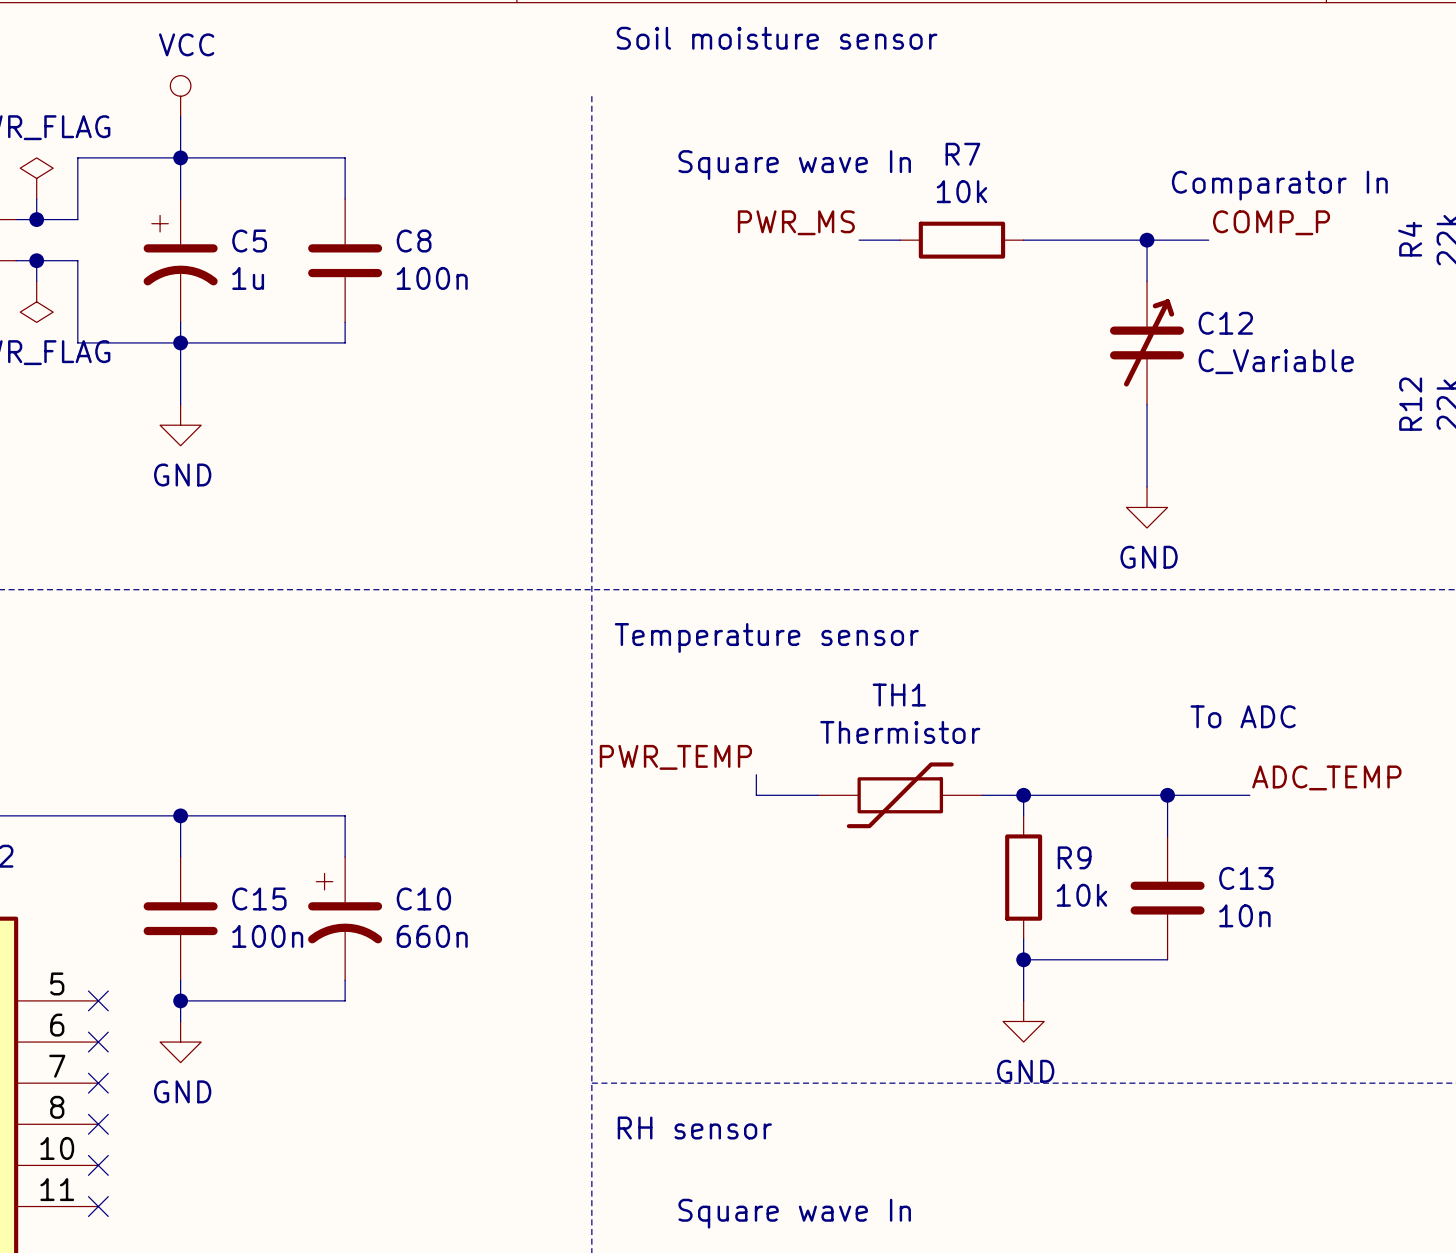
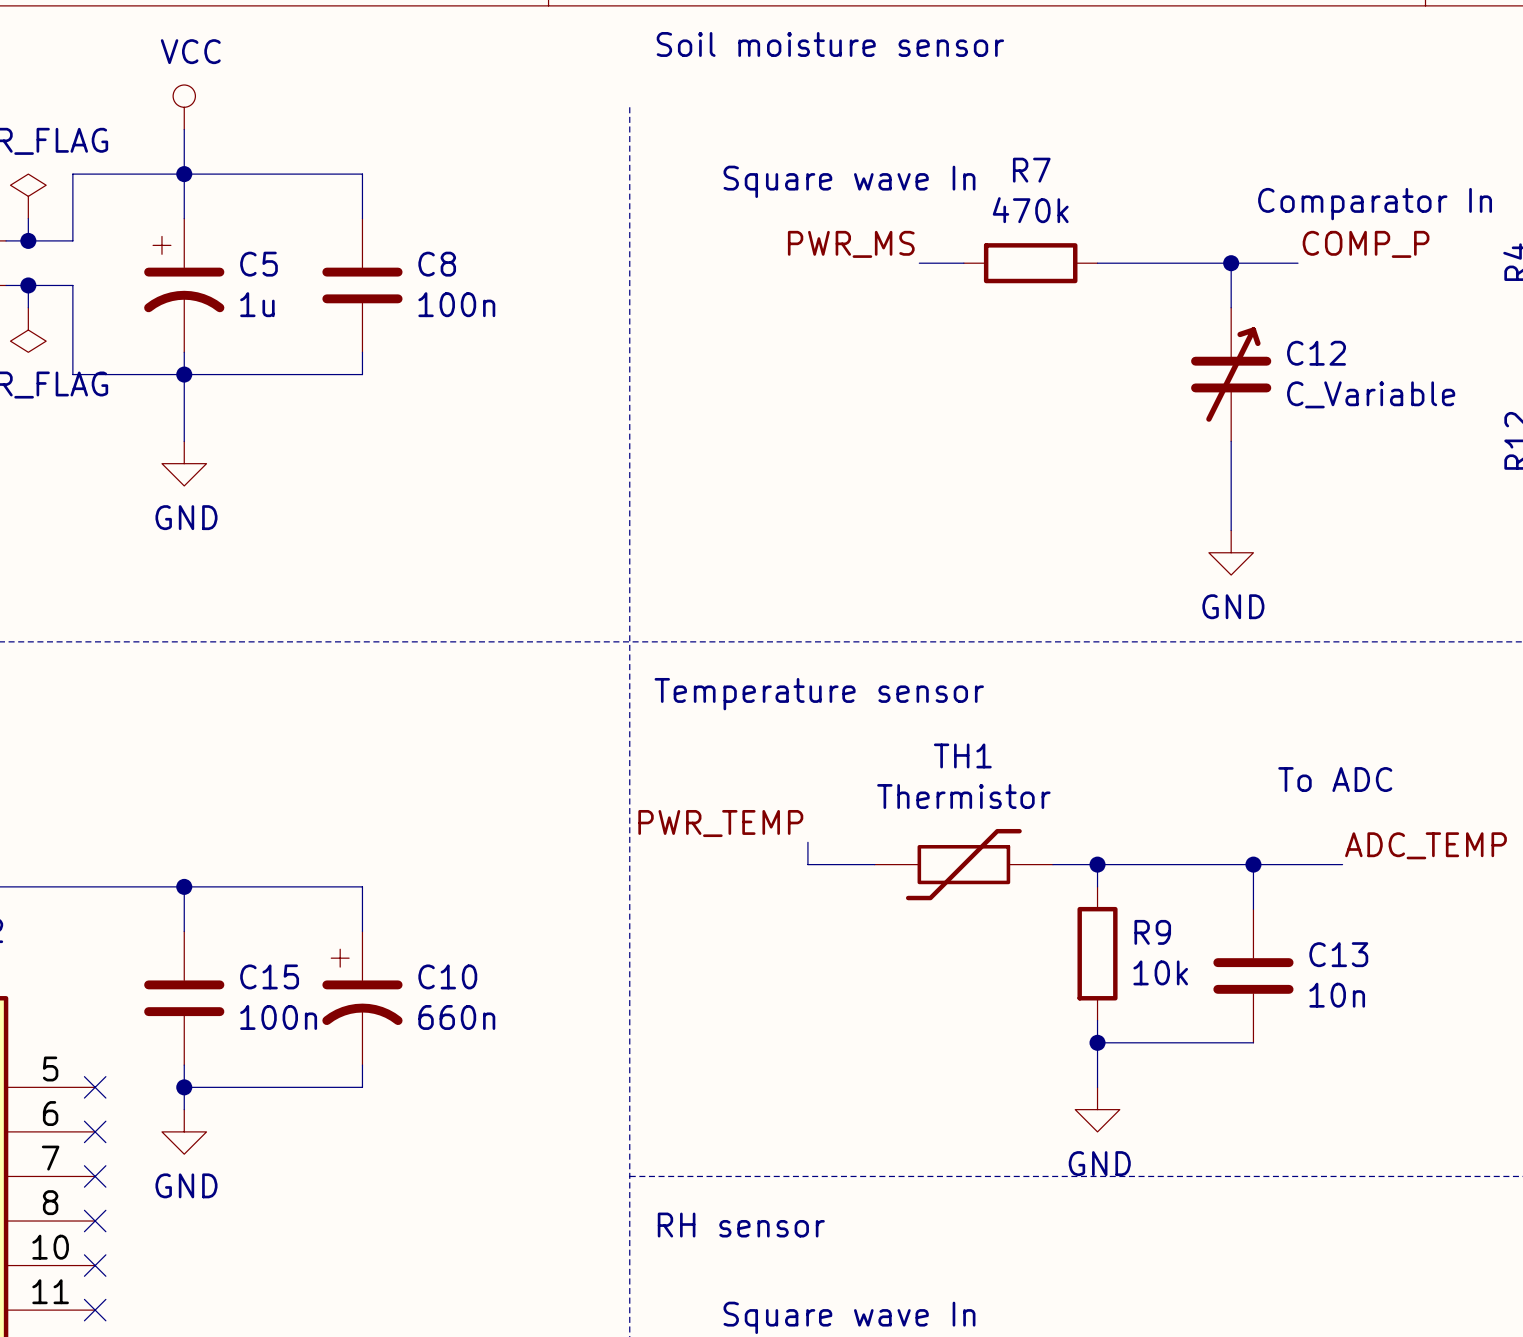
R7 value: 10k (961, 191) -> 470k (1030, 210)

